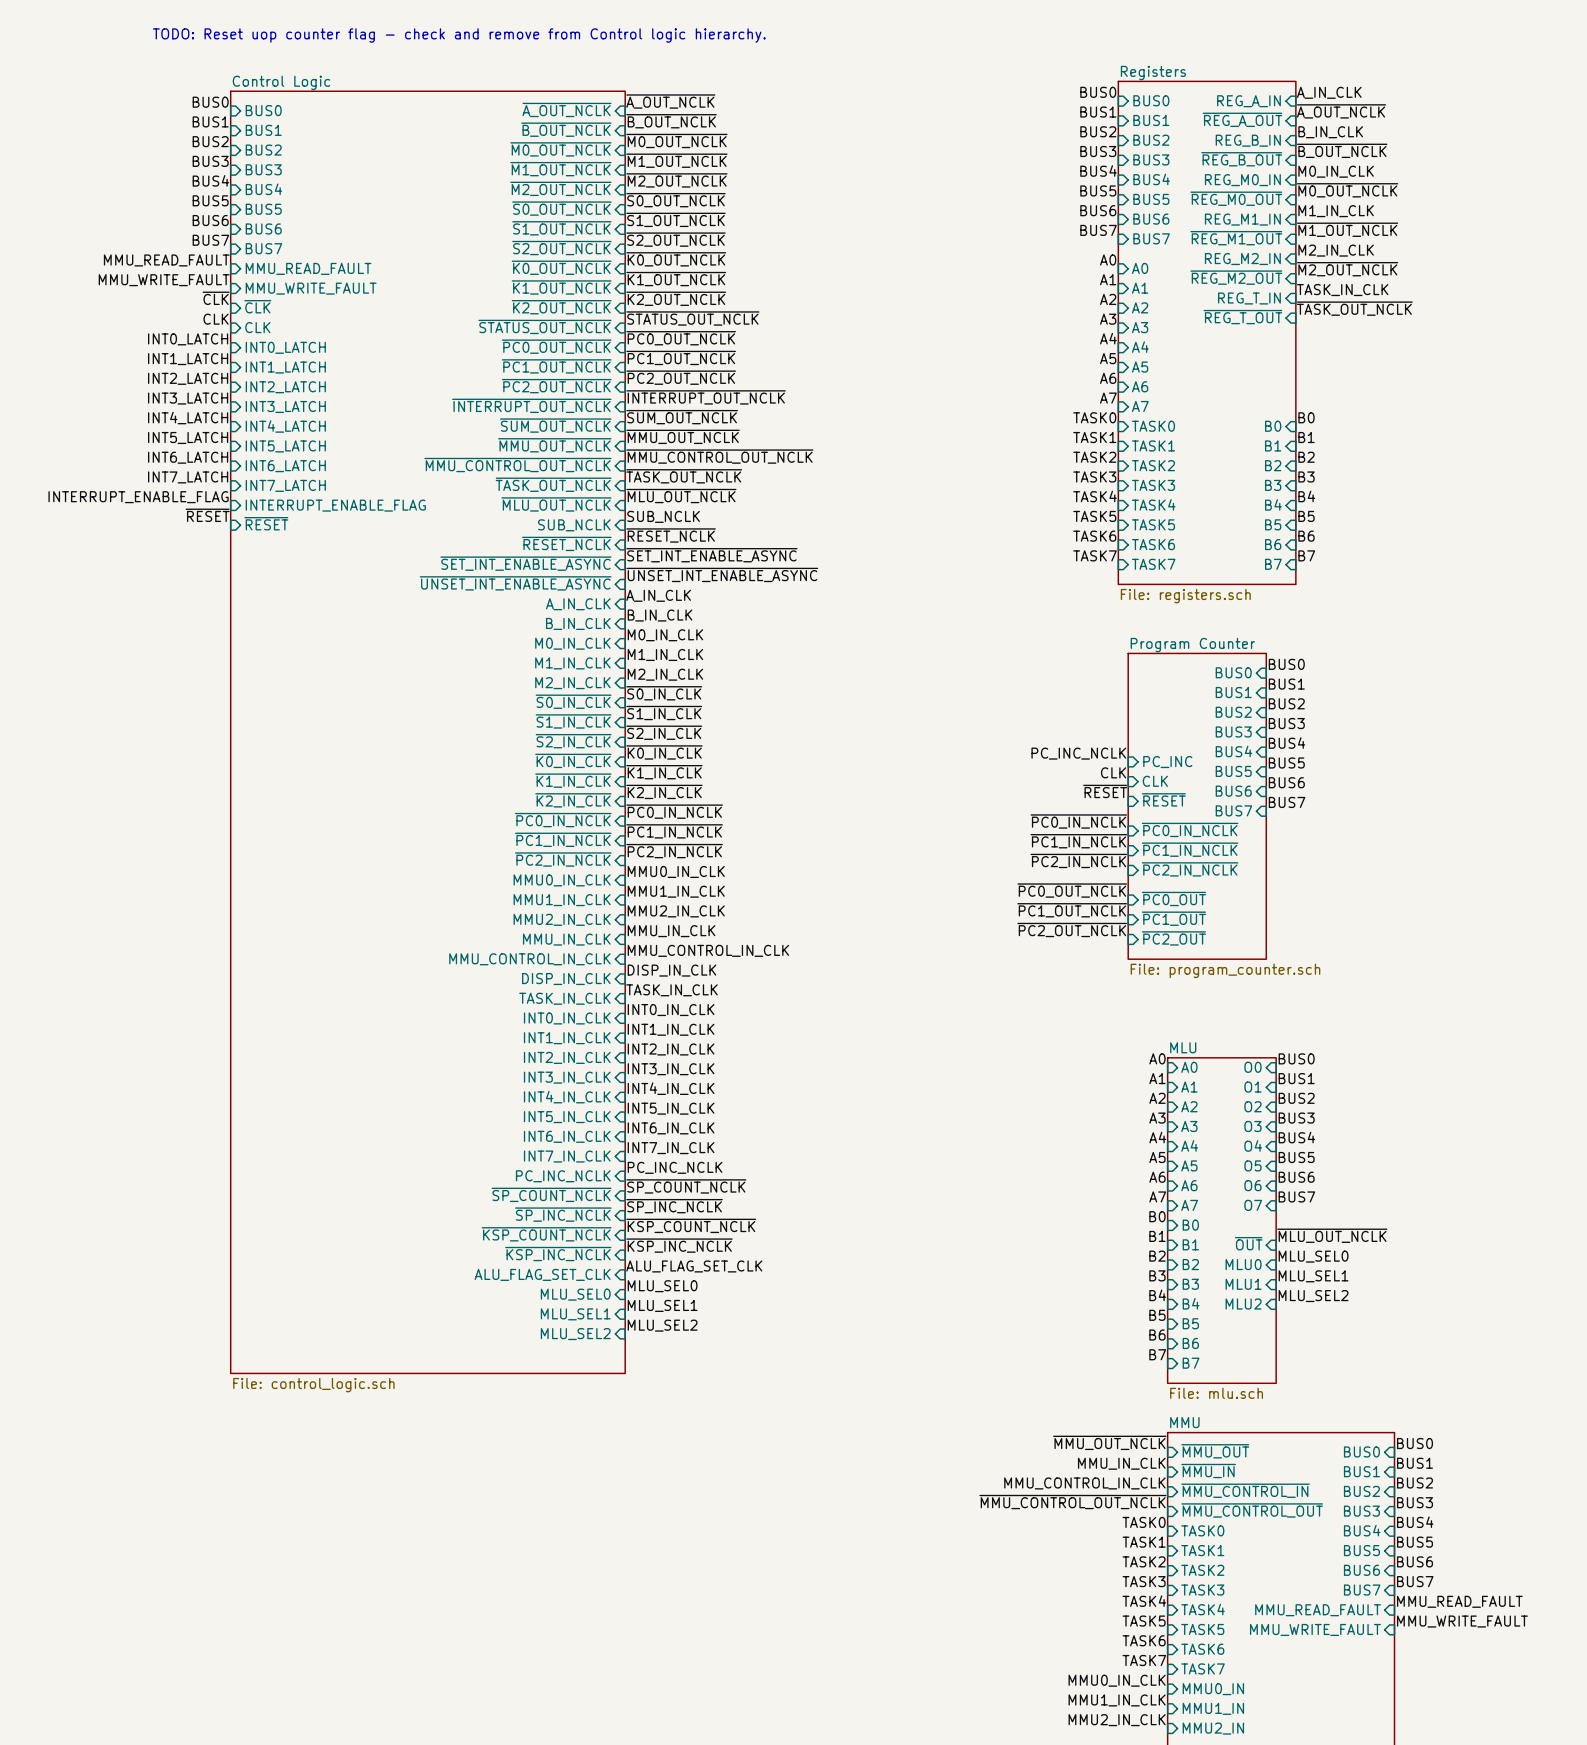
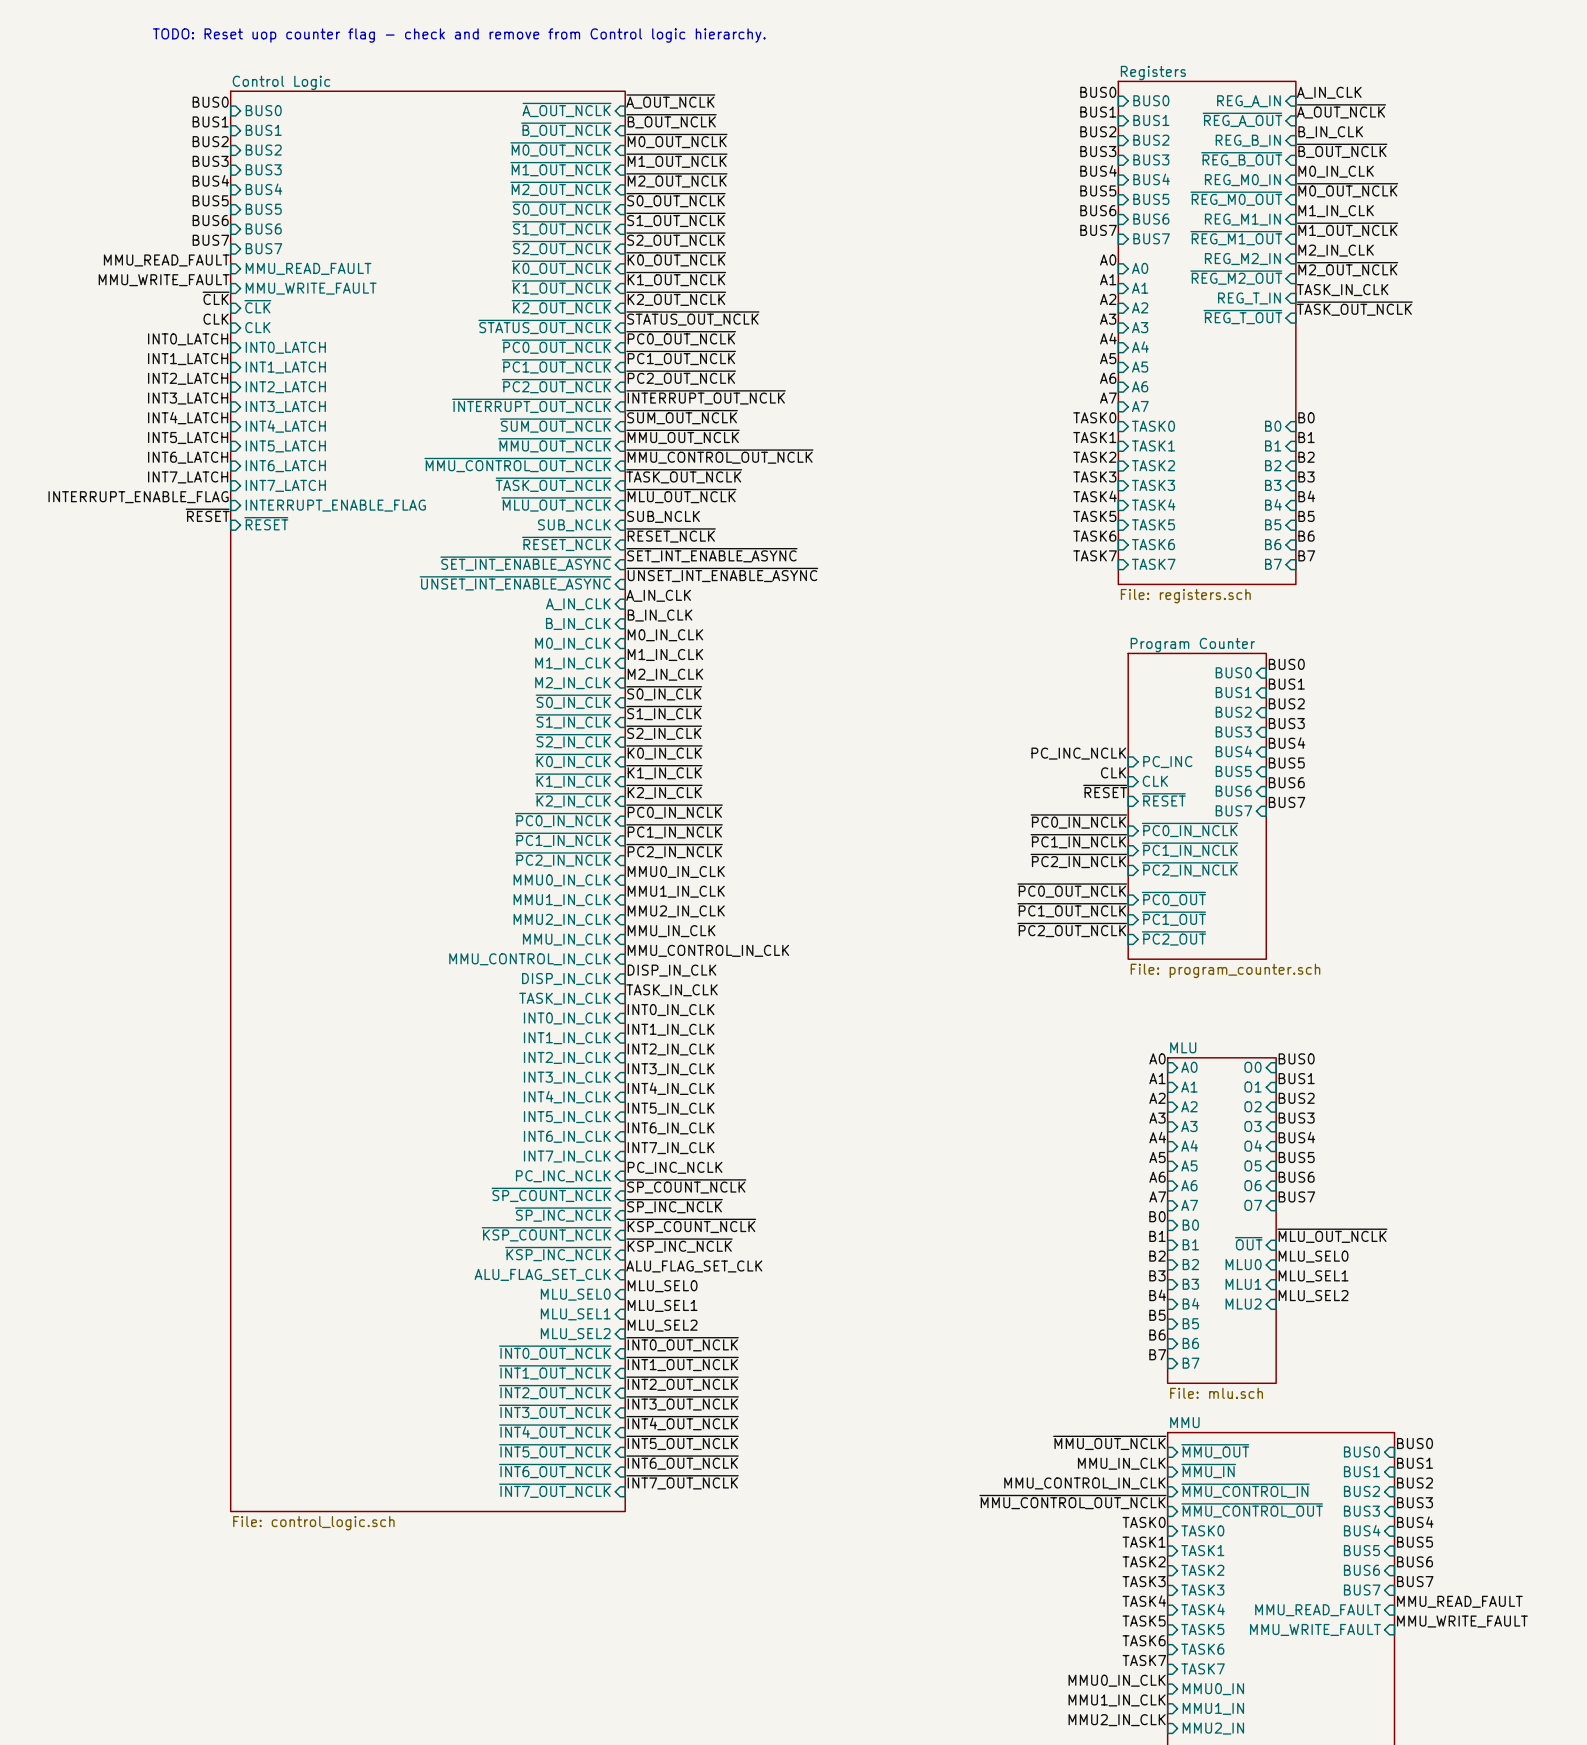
sheet Control Logic: File: control_logic.sch (427, 732) -> none
sheet Control Logic: none -> File: control_logic.sch (427, 801)
label: none -> ~{INT0_OUT_NCLK} (682, 1344)
sheet pin: none -> ~{INT0_OUT_NCLK} (555, 1352)
label: none -> ~{INT1_OUT_NCLK} (682, 1363)
sheet pin: none -> ~{INT1_OUT_NCLK} (555, 1372)
label: none -> ~{INT2_OUT_NCLK} (682, 1383)
sheet pin: none -> ~{INT2_OUT_NCLK} (555, 1392)
label: none -> ~{INT3_OUT_NCLK} (682, 1403)
sheet pin: none -> ~{INT3_OUT_NCLK} (555, 1411)
label: none -> ~{INT4_OUT_NCLK} (682, 1423)
sheet pin: none -> ~{INT4_OUT_NCLK} (555, 1431)
label: none -> ~{INT5_OUT_NCLK} (682, 1442)
sheet pin: none -> ~{INT5_OUT_NCLK} (555, 1451)
label: none -> ~{INT6_OUT_NCLK} (682, 1462)
sheet pin: none -> ~{INT6_OUT_NCLK} (555, 1471)
label: none -> ~{INT7_OUT_NCLK} (682, 1482)
sheet pin: none -> ~{INT7_OUT_NCLK} (555, 1490)

